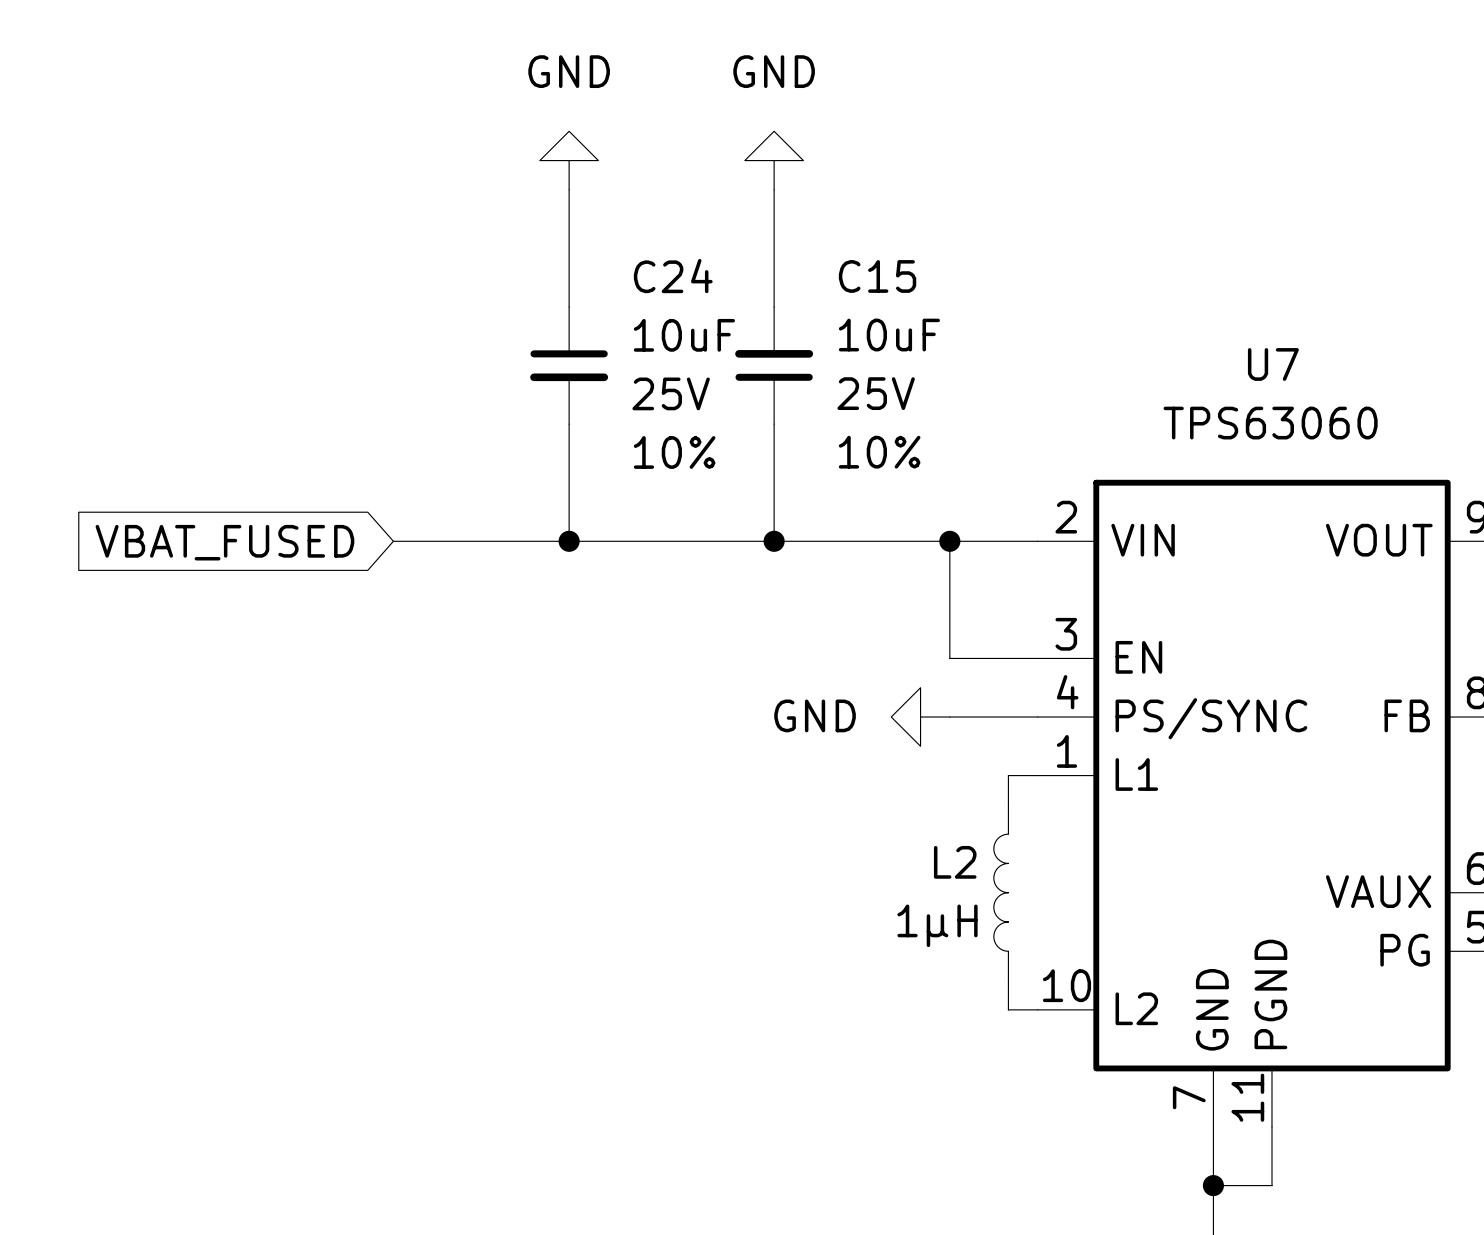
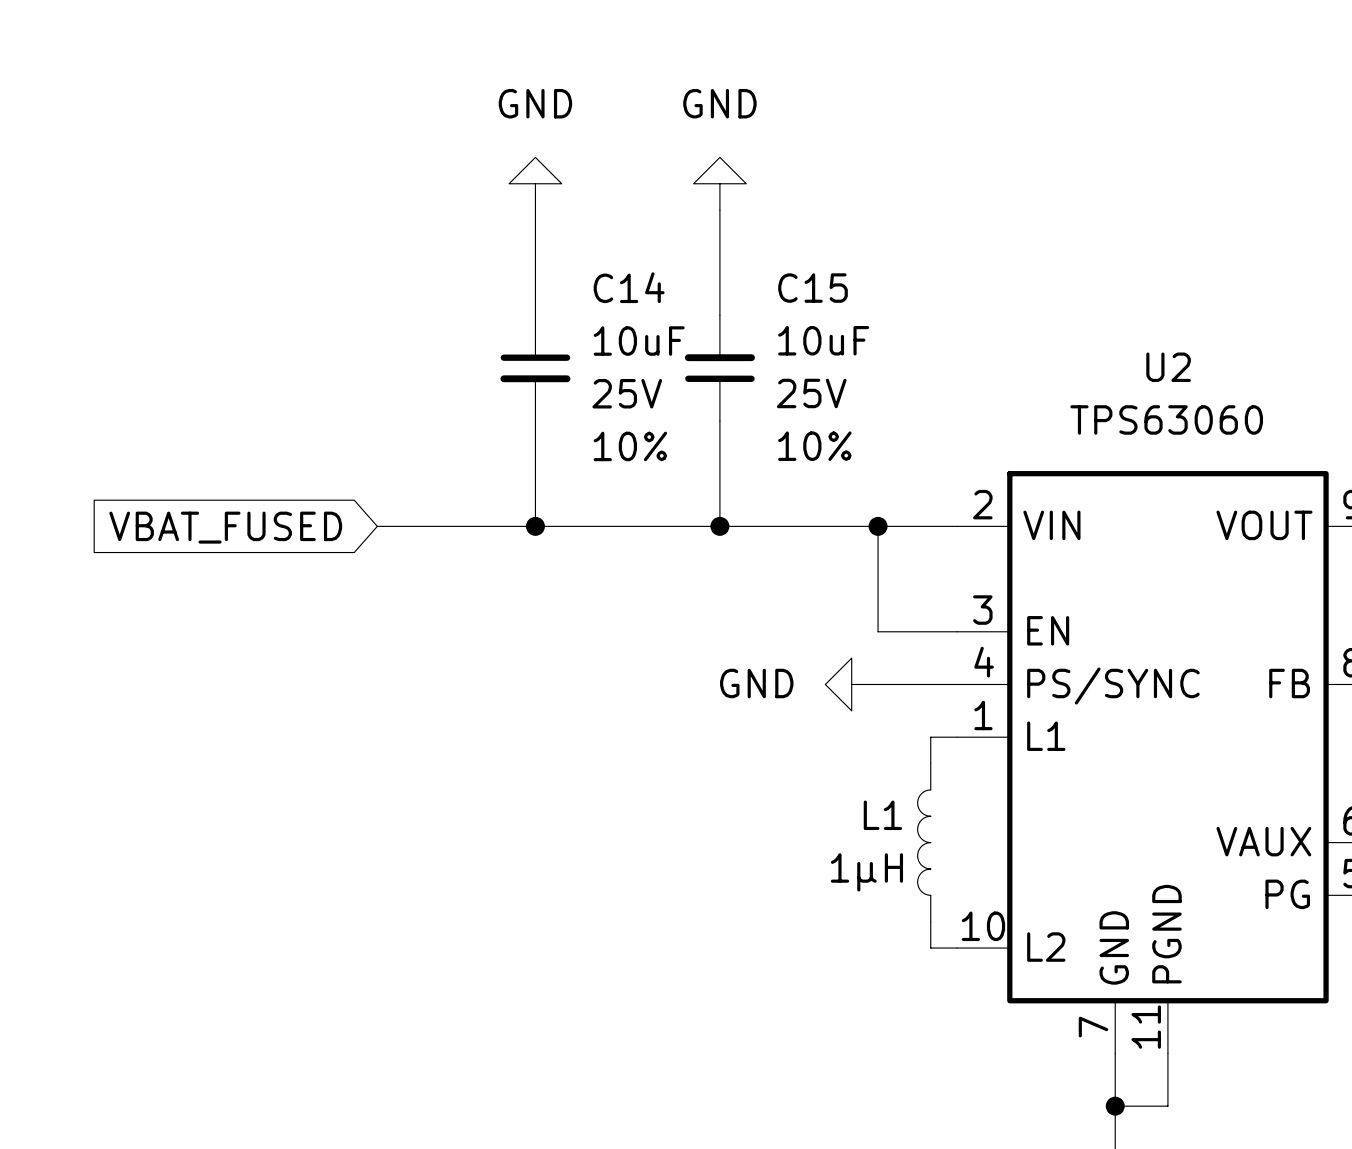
C24 name: C24 (673, 276) -> C14 (629, 287)
U7 name: U7 (1273, 364) -> U2 (1168, 367)
L2 name: L2 (955, 862) -> L1 (882, 815)

